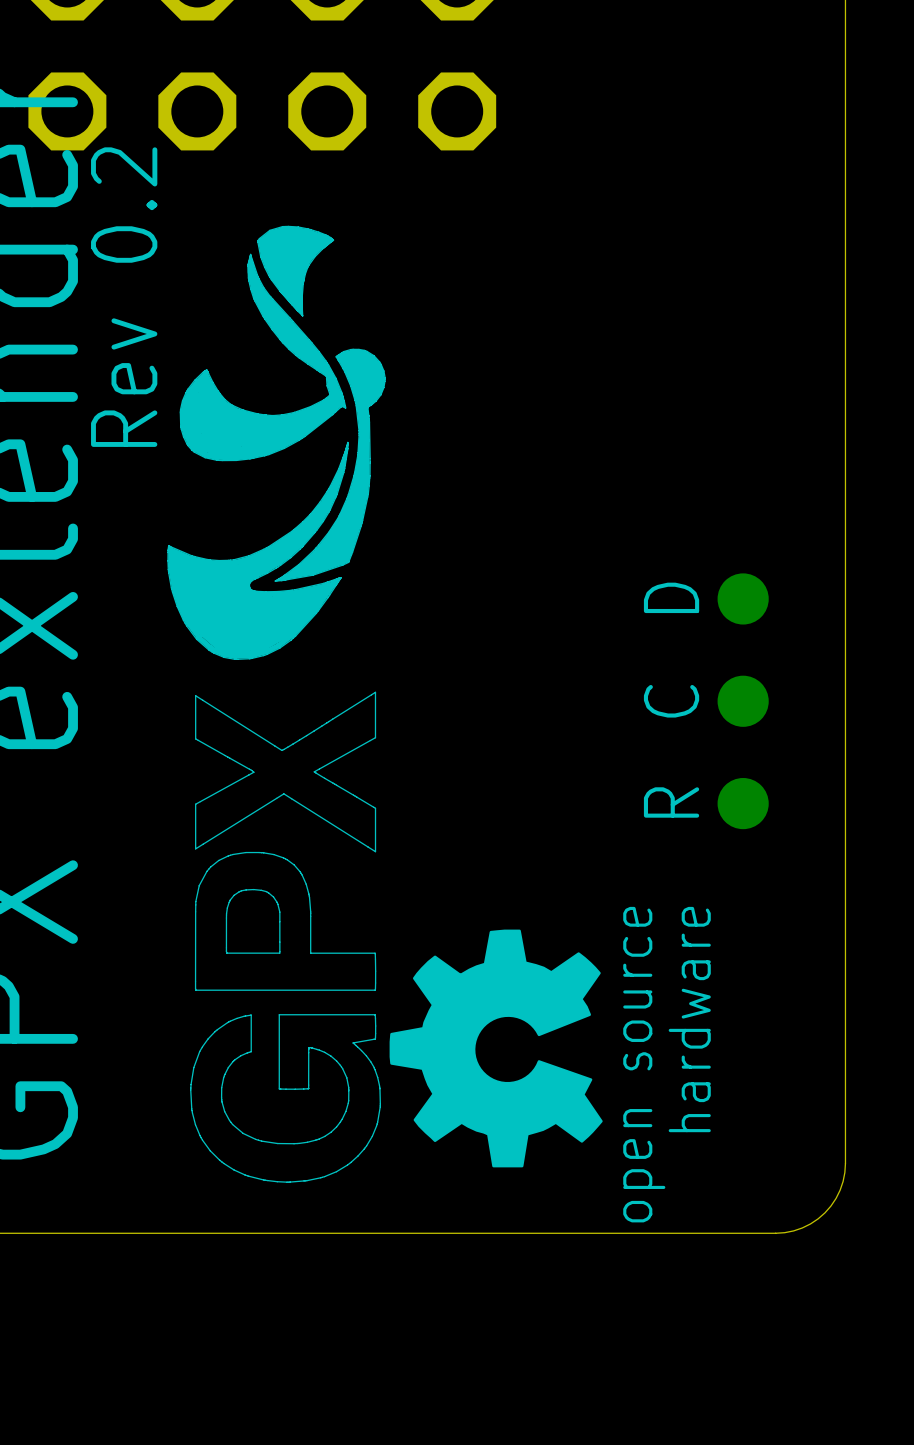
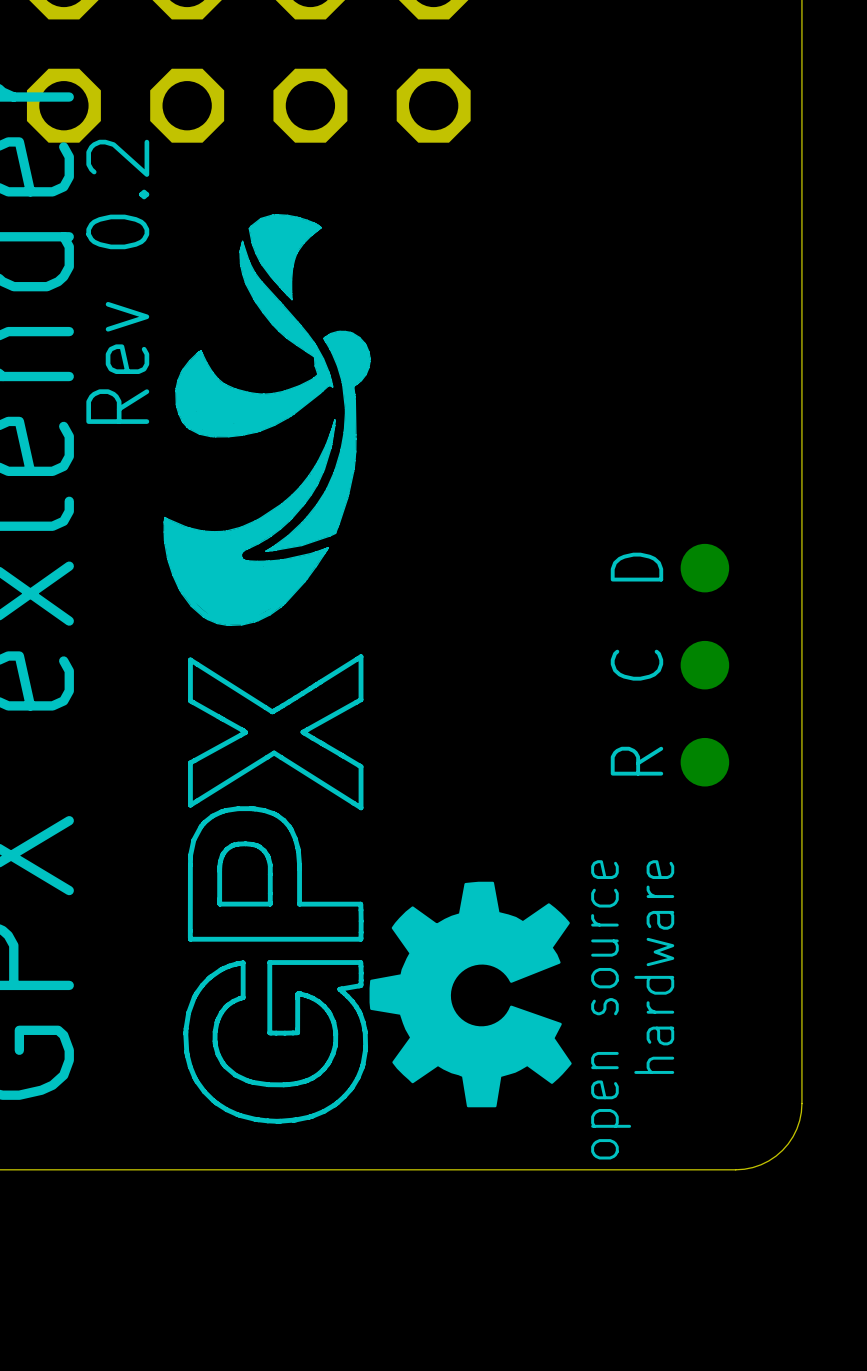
drawing shape: [167, 226, 386, 1183] -> [164, 214, 371, 1124]

